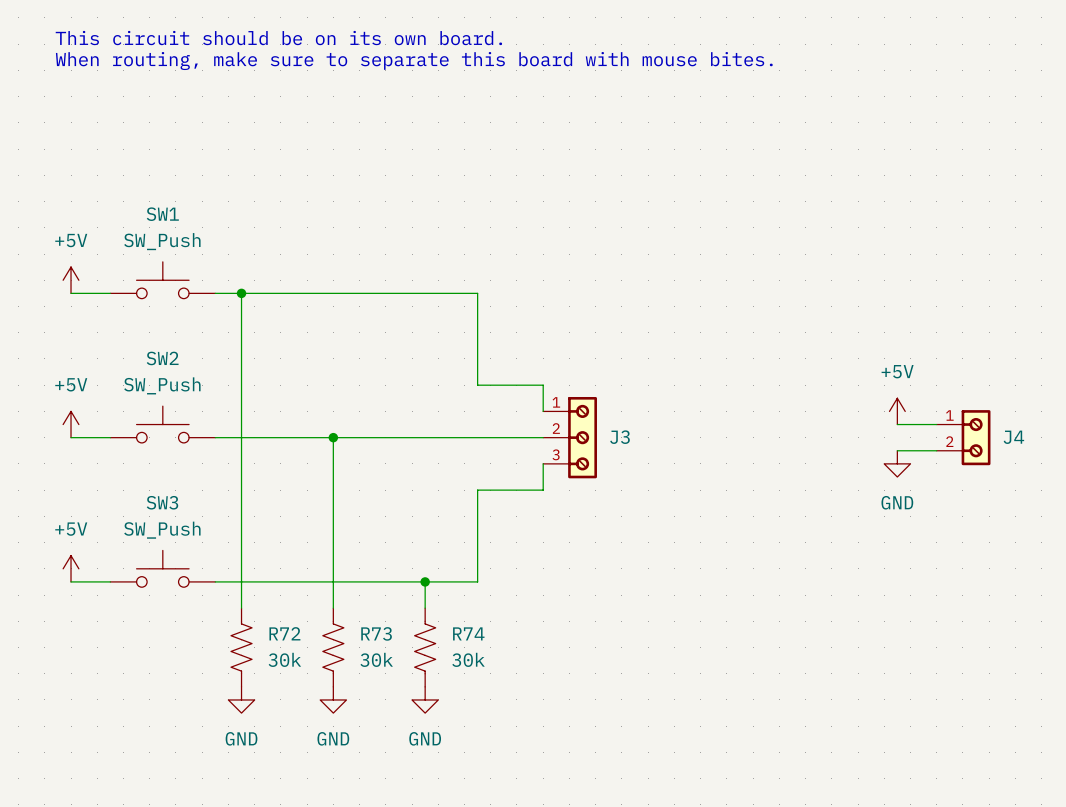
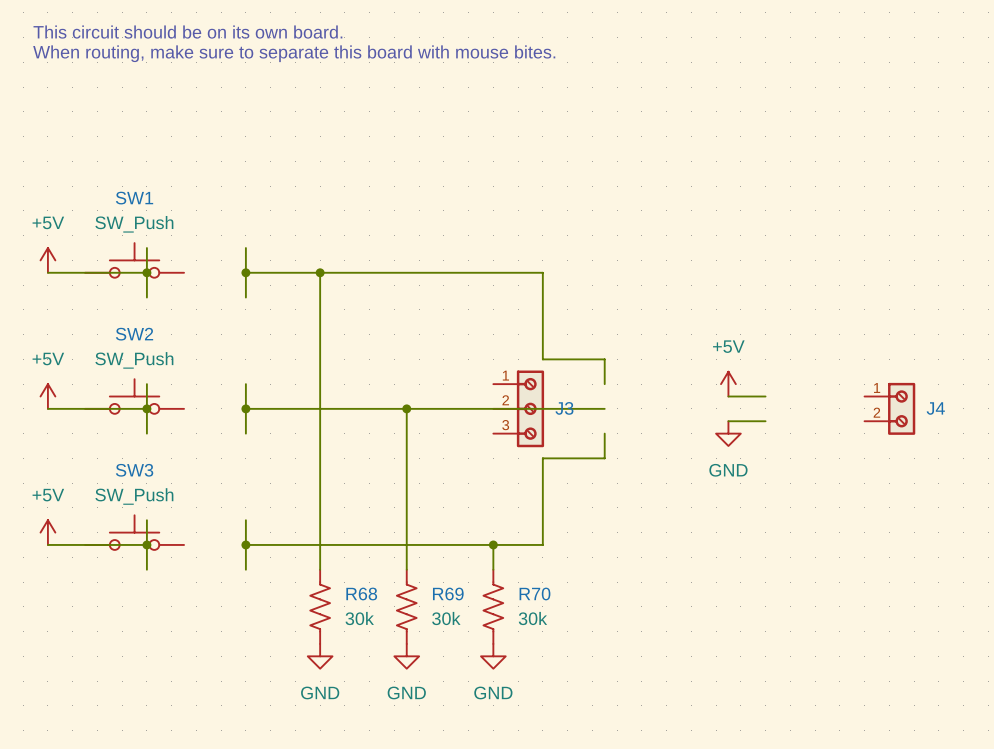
wire: none -> (146, 248) (146, 297)
wire: none -> (245, 248) (245, 297)
junction: none -> (146, 272)
wire: (215, 293) (280, 293) -> (85, 272) (146, 272)
wire: (241, 293) (241, 608) -> (320, 272) (320, 569)
junction: (241, 293) -> none
junction: none -> (245, 272)
junction: none -> (320, 272)
wire: (477, 293) (477, 385) (543, 385) (543, 411) -> (431, 272) (542, 272) (542, 359) (604, 359) (604, 384)
wire: none -> (146, 384) (146, 433)
wire: none -> (245, 384) (245, 433)
power symbol position: +5V (897, 411) -> +5V (728, 384)
wire: (897, 424) (936, 424) -> (728, 396) (765, 396)
junction: none -> (146, 408)
wire: (215, 437) (280, 437) -> (85, 408) (146, 408)
wire: (333, 437) (333, 608) -> (406, 408) (406, 569)
junction position: (333, 437) -> (245, 408)
junction: none -> (406, 408)
wire: none -> (493, 408) (604, 408)
wire: (897, 450) (936, 450) -> (728, 421) (765, 421)
wire: (543, 463) (543, 490) (477, 490) (477, 581) -> (604, 433) (604, 458) (542, 458) (542, 544) (431, 544)
power symbol position: GND (897, 463) -> GND (728, 433)
wire: none -> (146, 520) (146, 569)
wire: none -> (245, 520) (245, 569)
junction: none -> (146, 544)
wire: (215, 581) (280, 581) -> (85, 544) (146, 544)
junction: none -> (245, 544)
wire: (425, 581) (425, 608) -> (493, 544) (493, 569)
junction: (425, 581) -> none
junction: none -> (493, 544)
R72: 30k (241, 647) -> none
R73: 30k (333, 647) -> none
R68: none -> 30k (320, 606)
R74: 30k (425, 647) -> none
R69: none -> 30k (406, 606)
R70: none -> 30k (493, 606)
power symbol: GND (241, 699) -> none
power symbol position: GND (333, 699) -> GND (320, 656)
power symbol position: GND (425, 699) -> GND (406, 656)
power symbol: none -> GND (493, 656)

